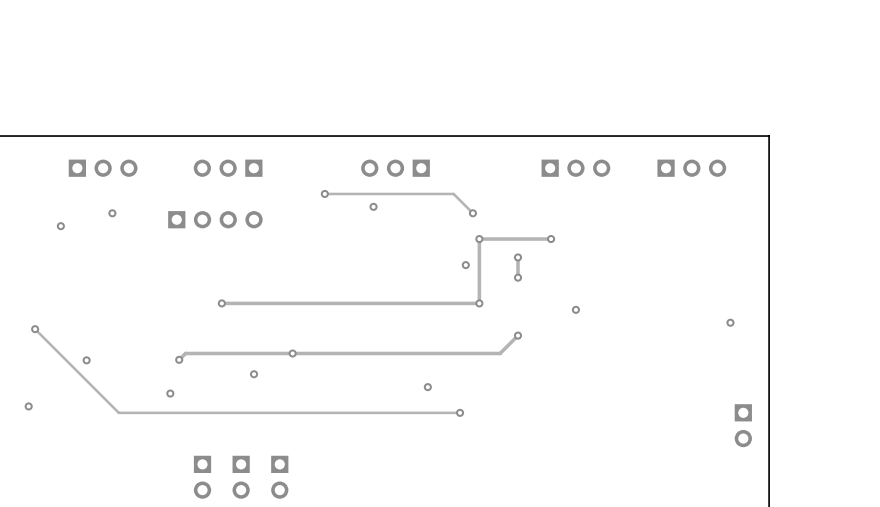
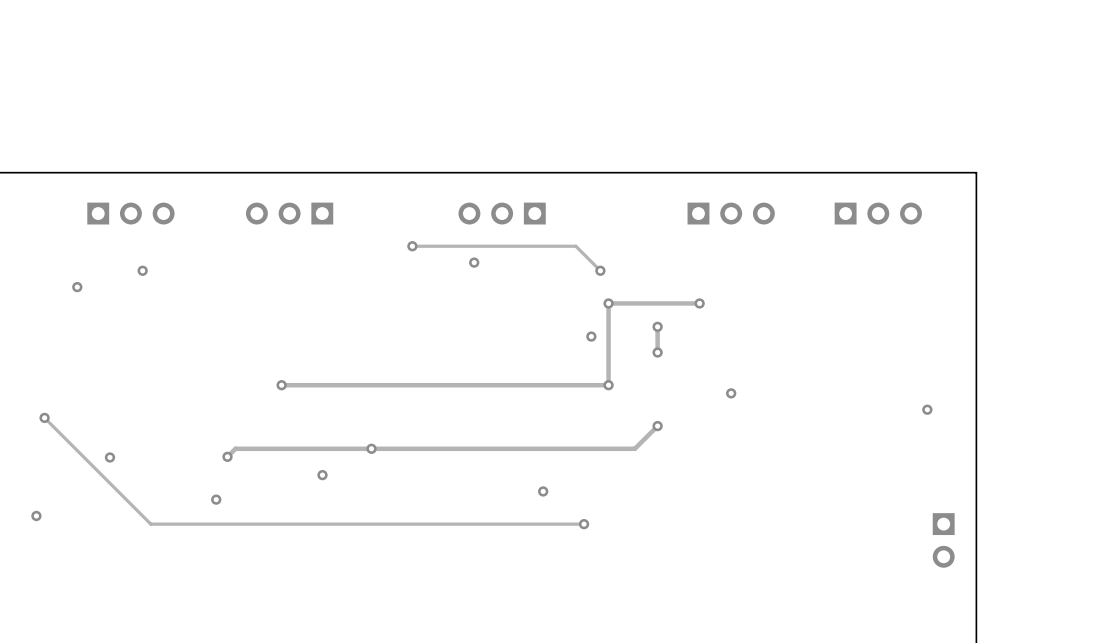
part: (215, 219) -> none
part: (202, 477) -> none
part: (241, 477) -> none
part: (279, 477) -> none

